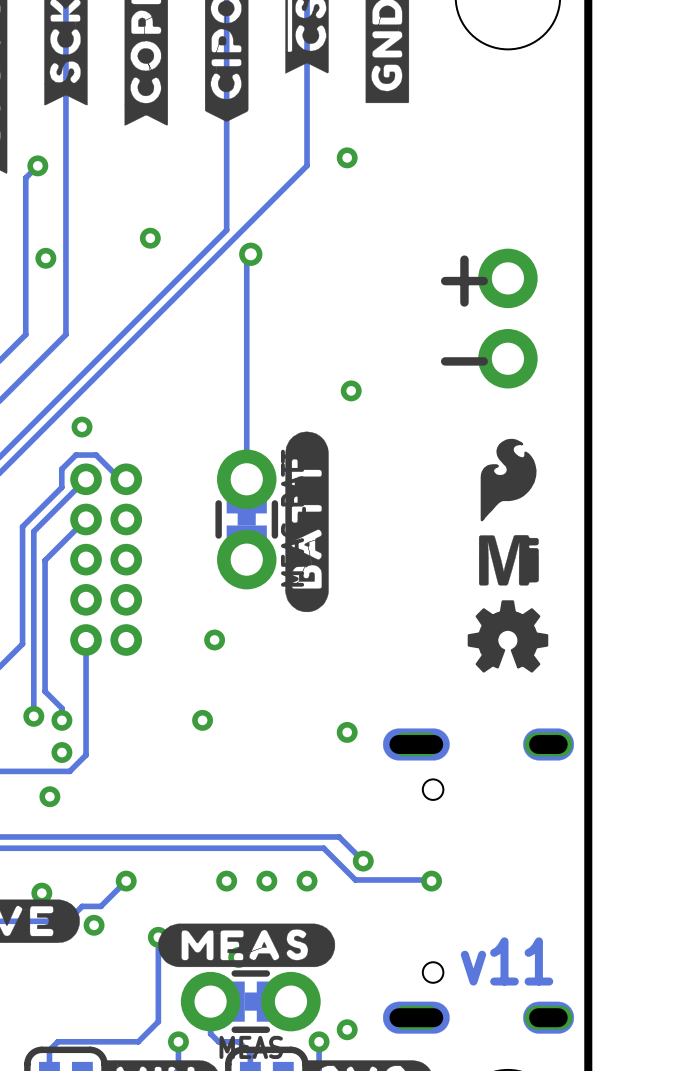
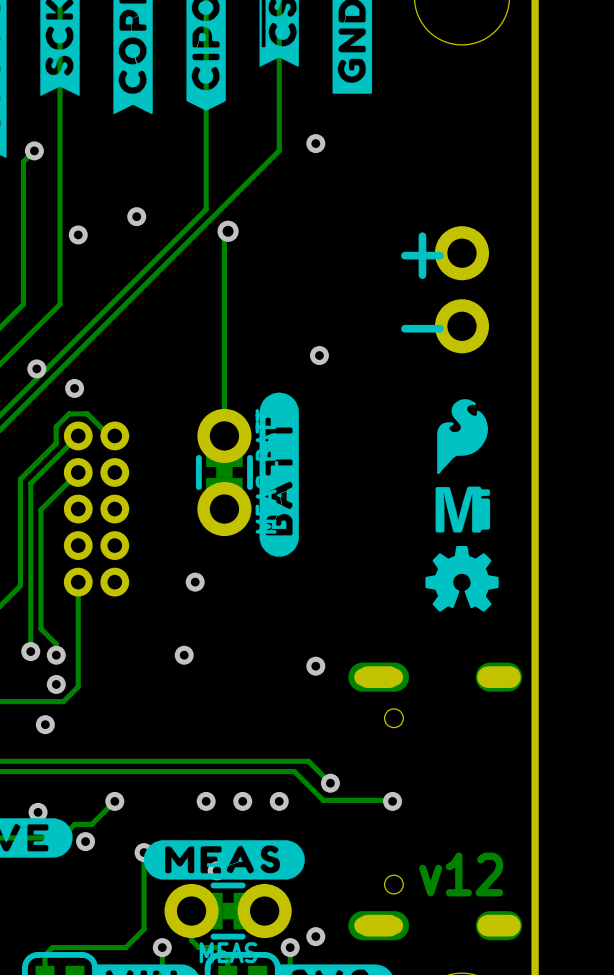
via position: (45, 258) -> (78, 234)
via: none -> (36, 368)
text: v11 (507, 961) -> v12 (461, 874)

